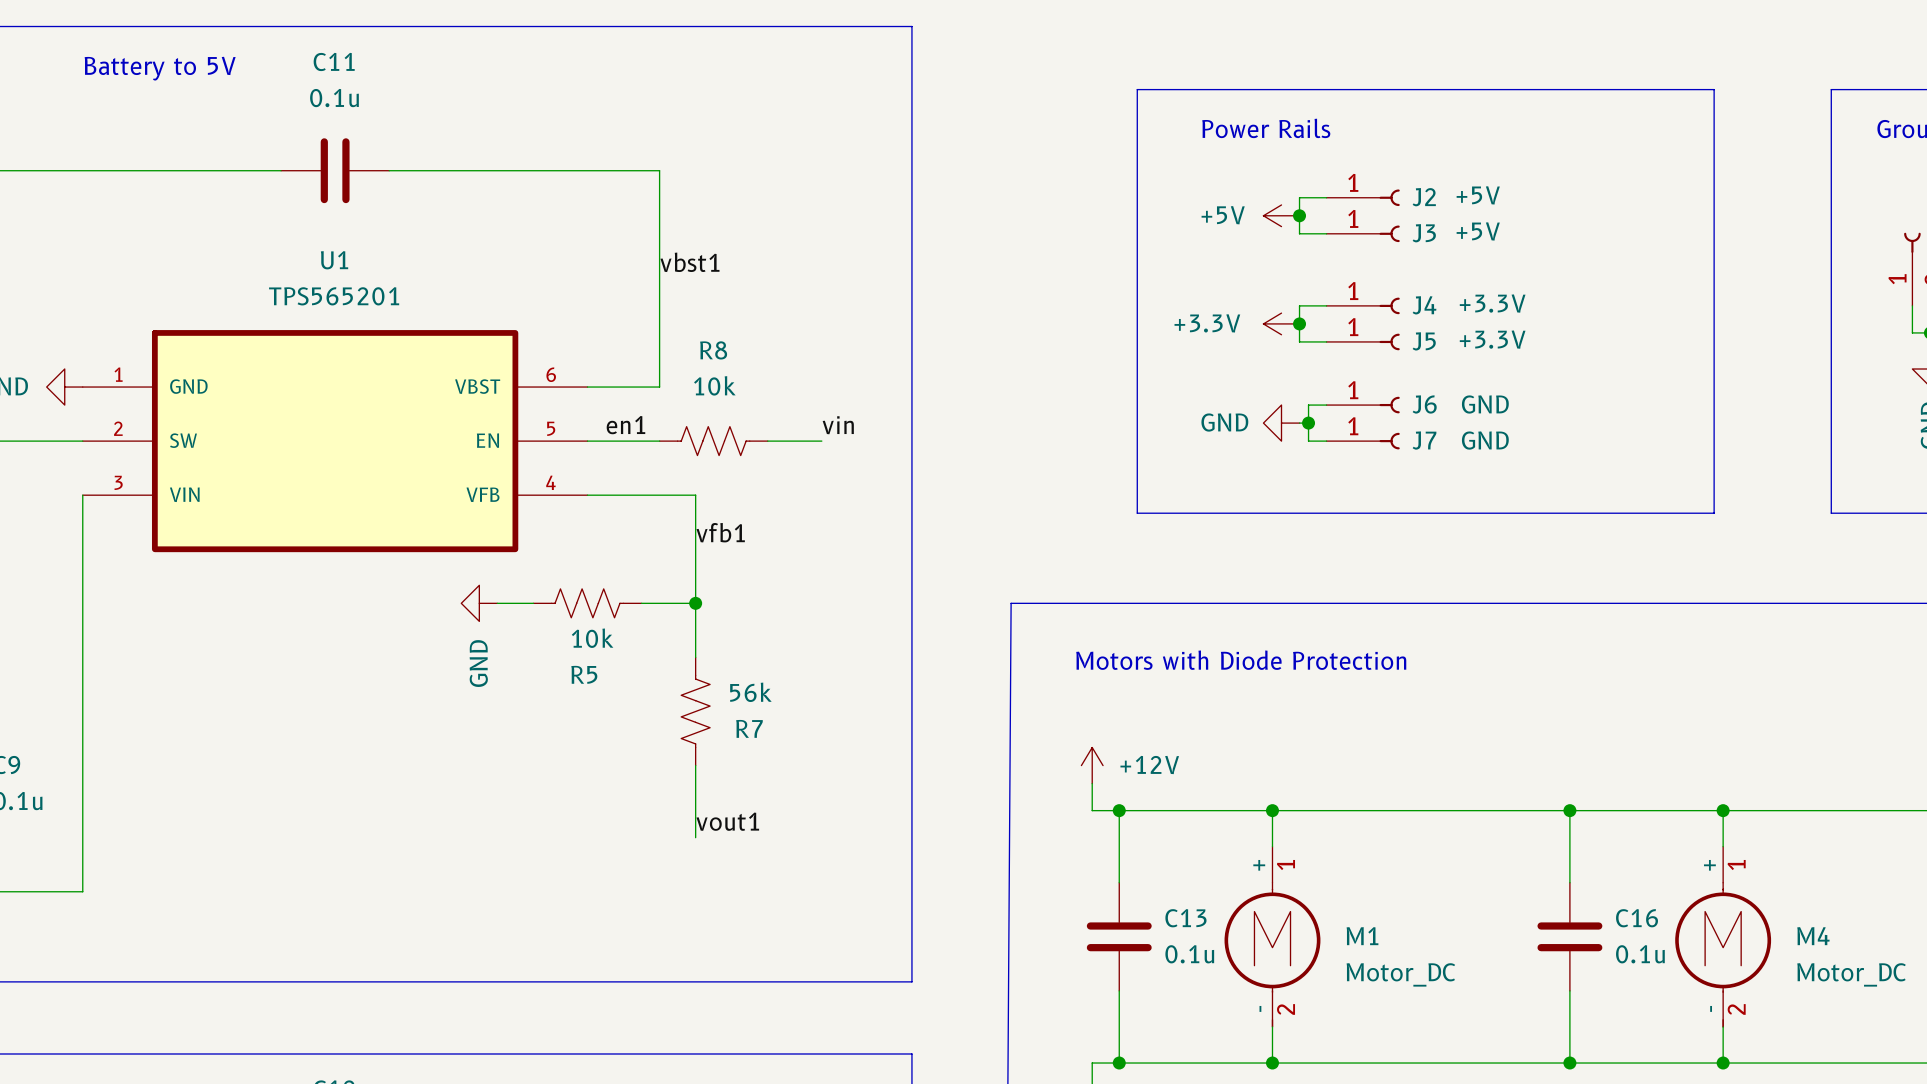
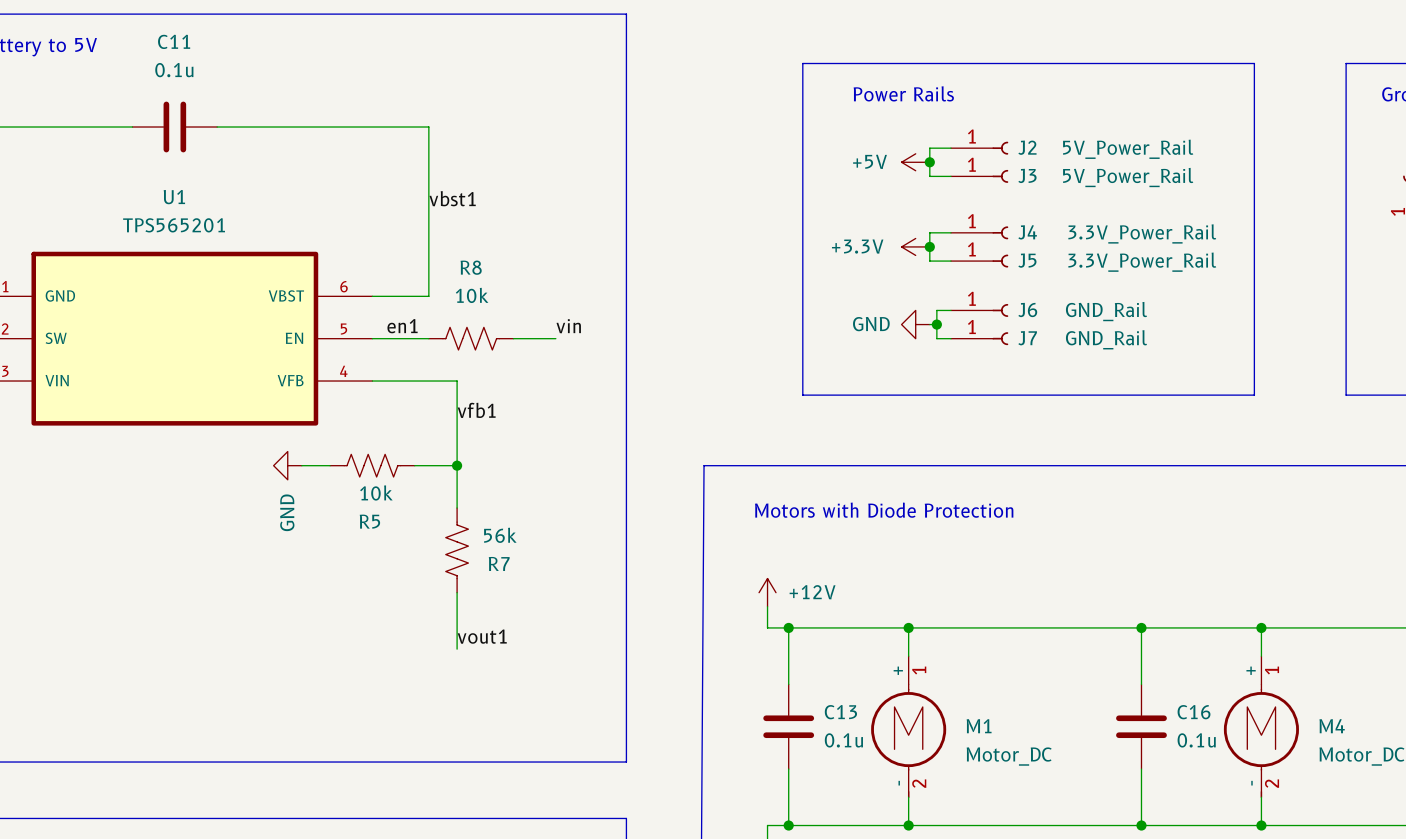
J2 value: +5V (1478, 195) -> 5V_Power_Rail (1128, 149)
J3 value: +5V (1478, 231) -> 5V_Power_Rail (1128, 177)
J4 value: +3.3V (1492, 303) -> 3.3V_Power_Rail (1142, 233)
J5 value: +3.3V (1492, 339) -> 3.3V_Power_Rail (1142, 262)
J6 value: GND (1485, 404) -> GND_Rail (1106, 311)
J7 value: GND (1485, 440) -> GND_Rail (1106, 339)

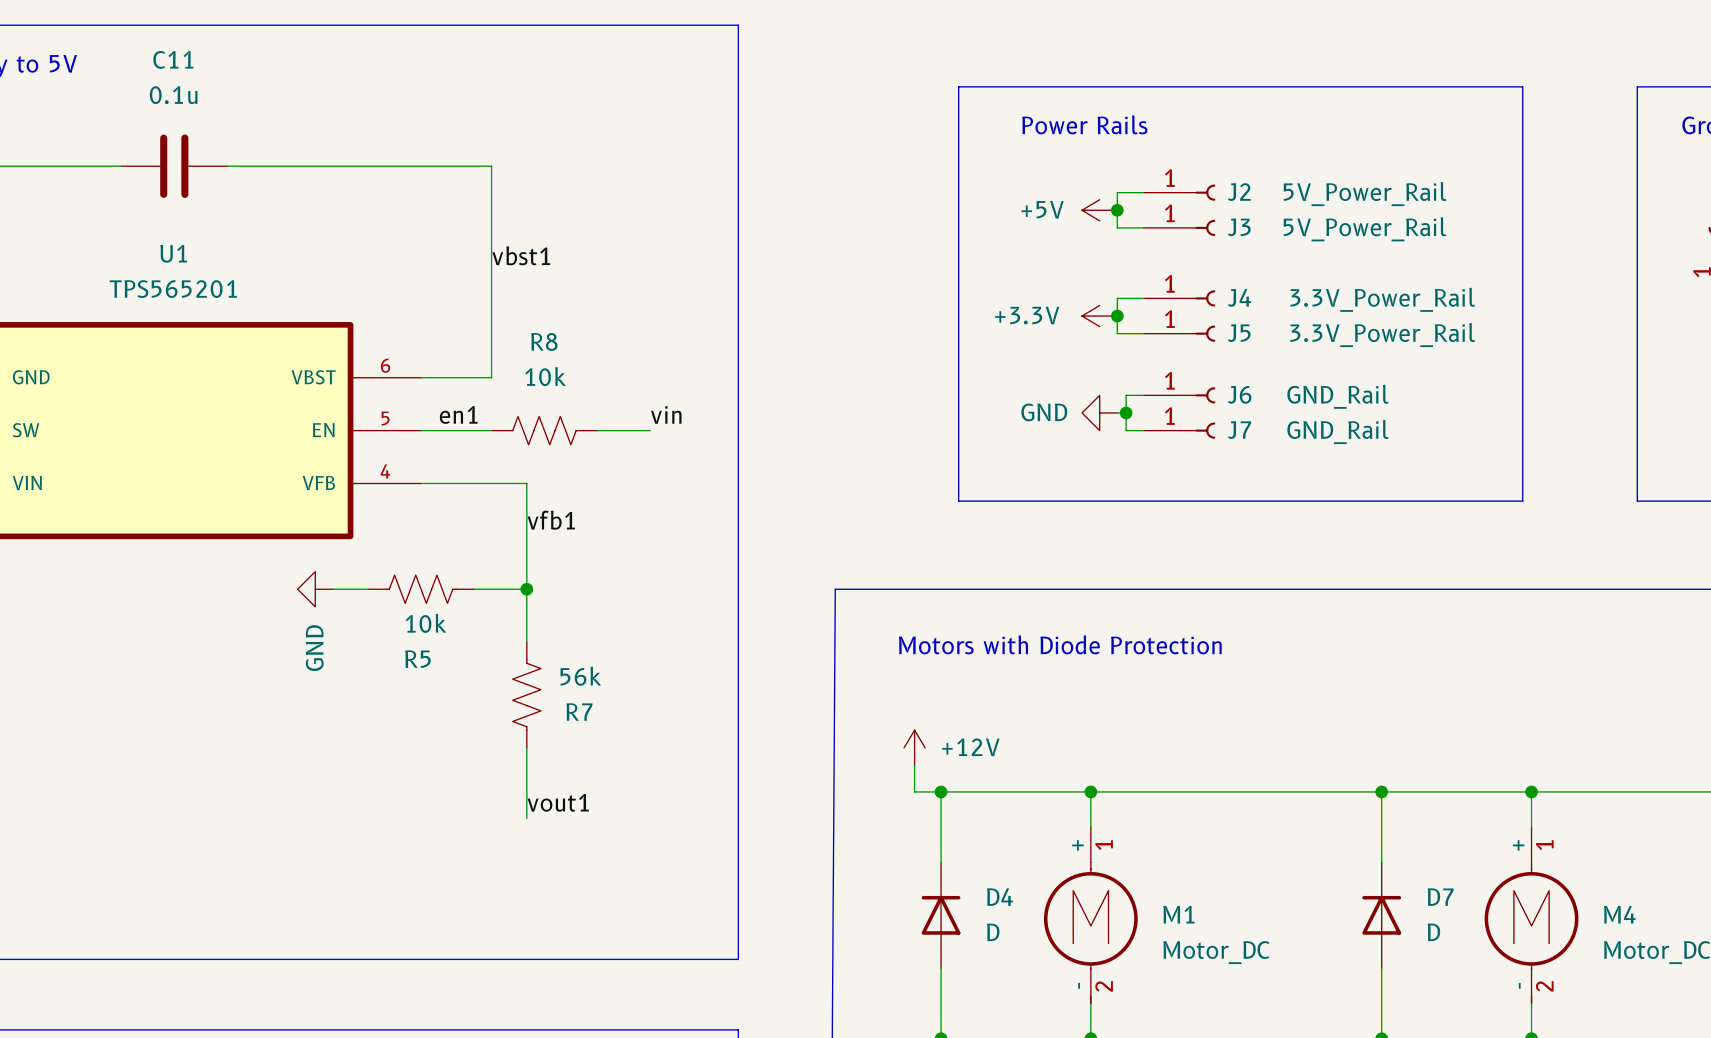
C13: 0.1u (788, 726) -> none
D4: none -> D (941, 915)
C16: 0.1u (1141, 726) -> none
D7: none -> D (1381, 915)

